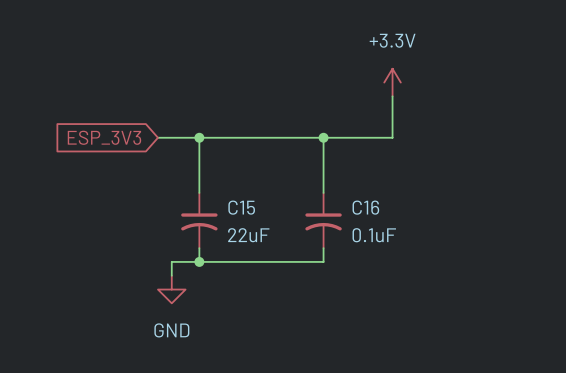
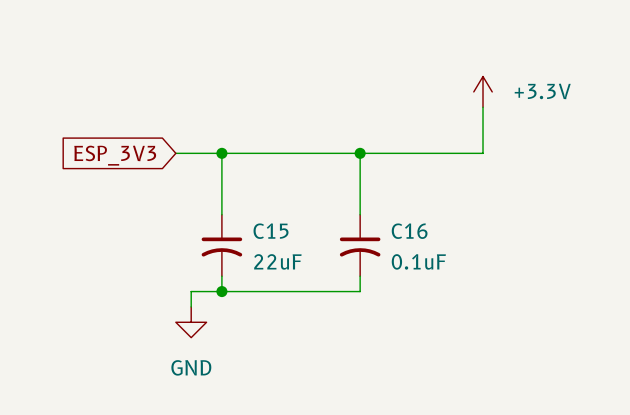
power symbol text position: +3.3V (392, 40) -> +3.3V (542, 91)
power symbol position: +3.3V (392, 82) -> +3.3V (483, 91)
wire: (392, 96) (392, 137) -> (483, 107) (483, 153) (436, 153)

